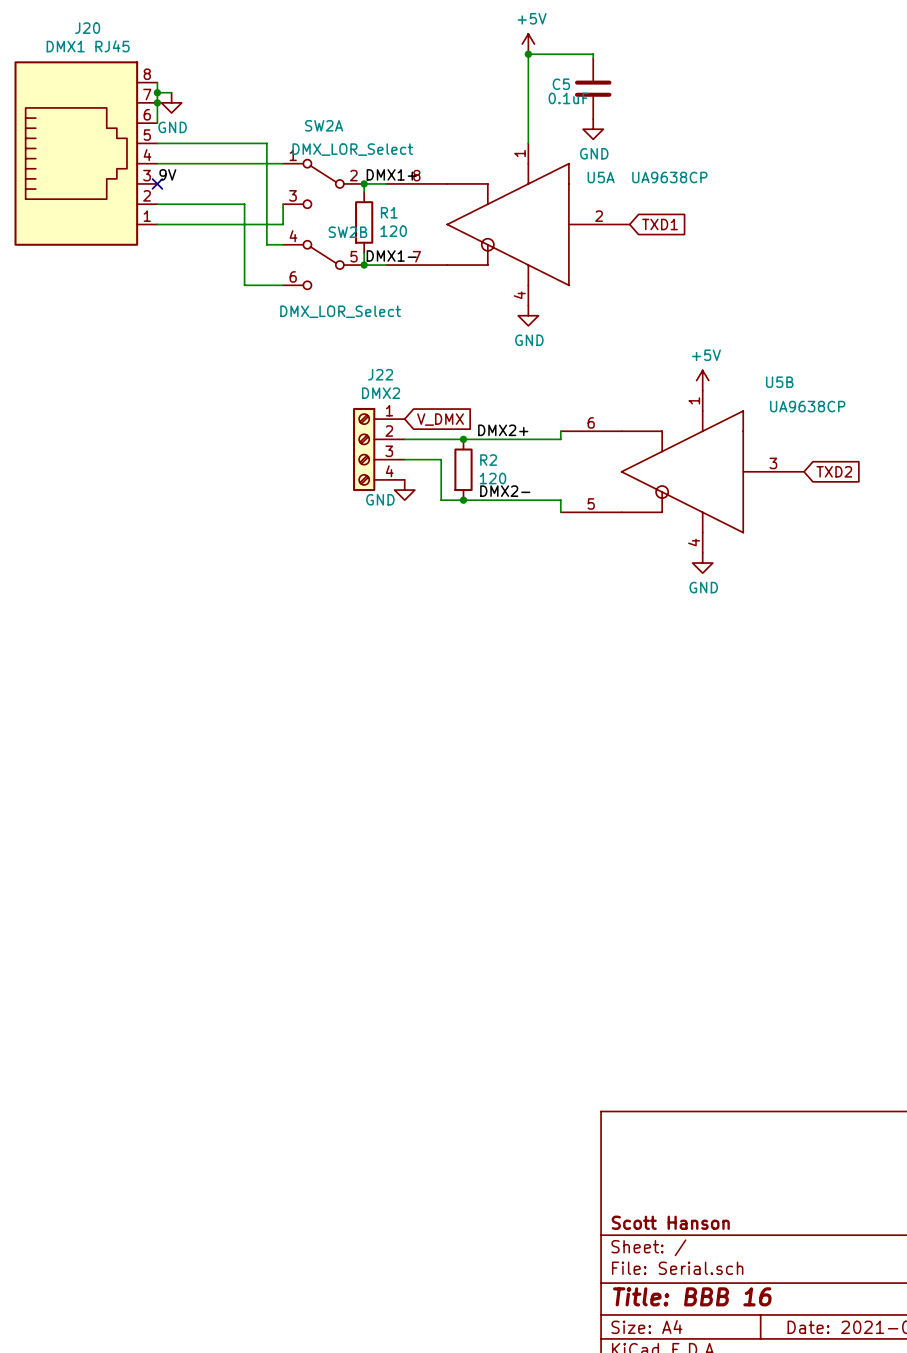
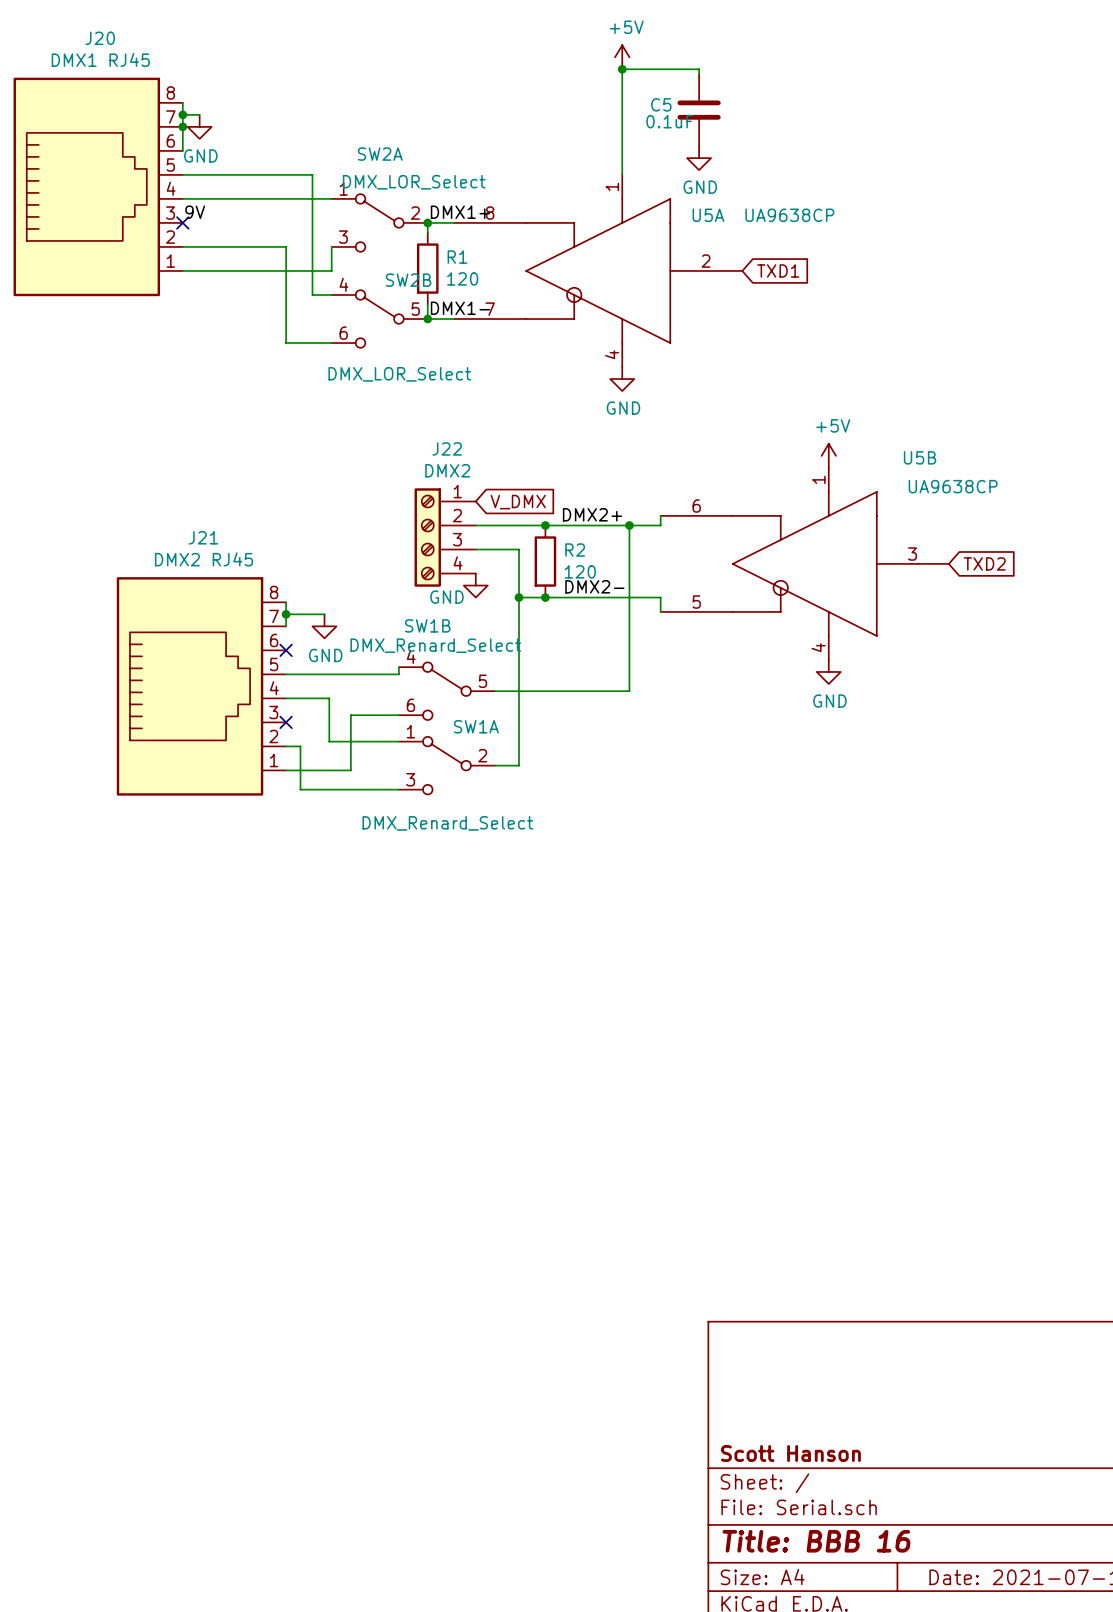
wire: none -> (629, 525) (629, 691) (494, 691)
junction: none -> (629, 525)
wire: none -> (519, 597) (519, 765) (494, 765)
junction: none -> (519, 597)
wire: none -> (286, 602) (286, 626)
wire: none -> (286, 614) (324, 614)
junction: none -> (286, 614)
power symbol: none -> GND (324, 626)
no-connect mark: none -> (286, 650)
wire: none -> (398, 667) (398, 674) (286, 674)
J21: none -> DMX2 RJ45 (201, 686)
SW1B: none -> DMX_Renard_Select (446, 691)
wire: none -> (286, 698) (329, 698) (329, 741) (398, 741)
wire: none -> (398, 715) (350, 715) (350, 770) (286, 770)
no-connect mark: none -> (286, 722)
wire: none -> (286, 746) (300, 746) (300, 789) (398, 789)
SW1A: none -> DMX_Renard_Select (446, 765)

